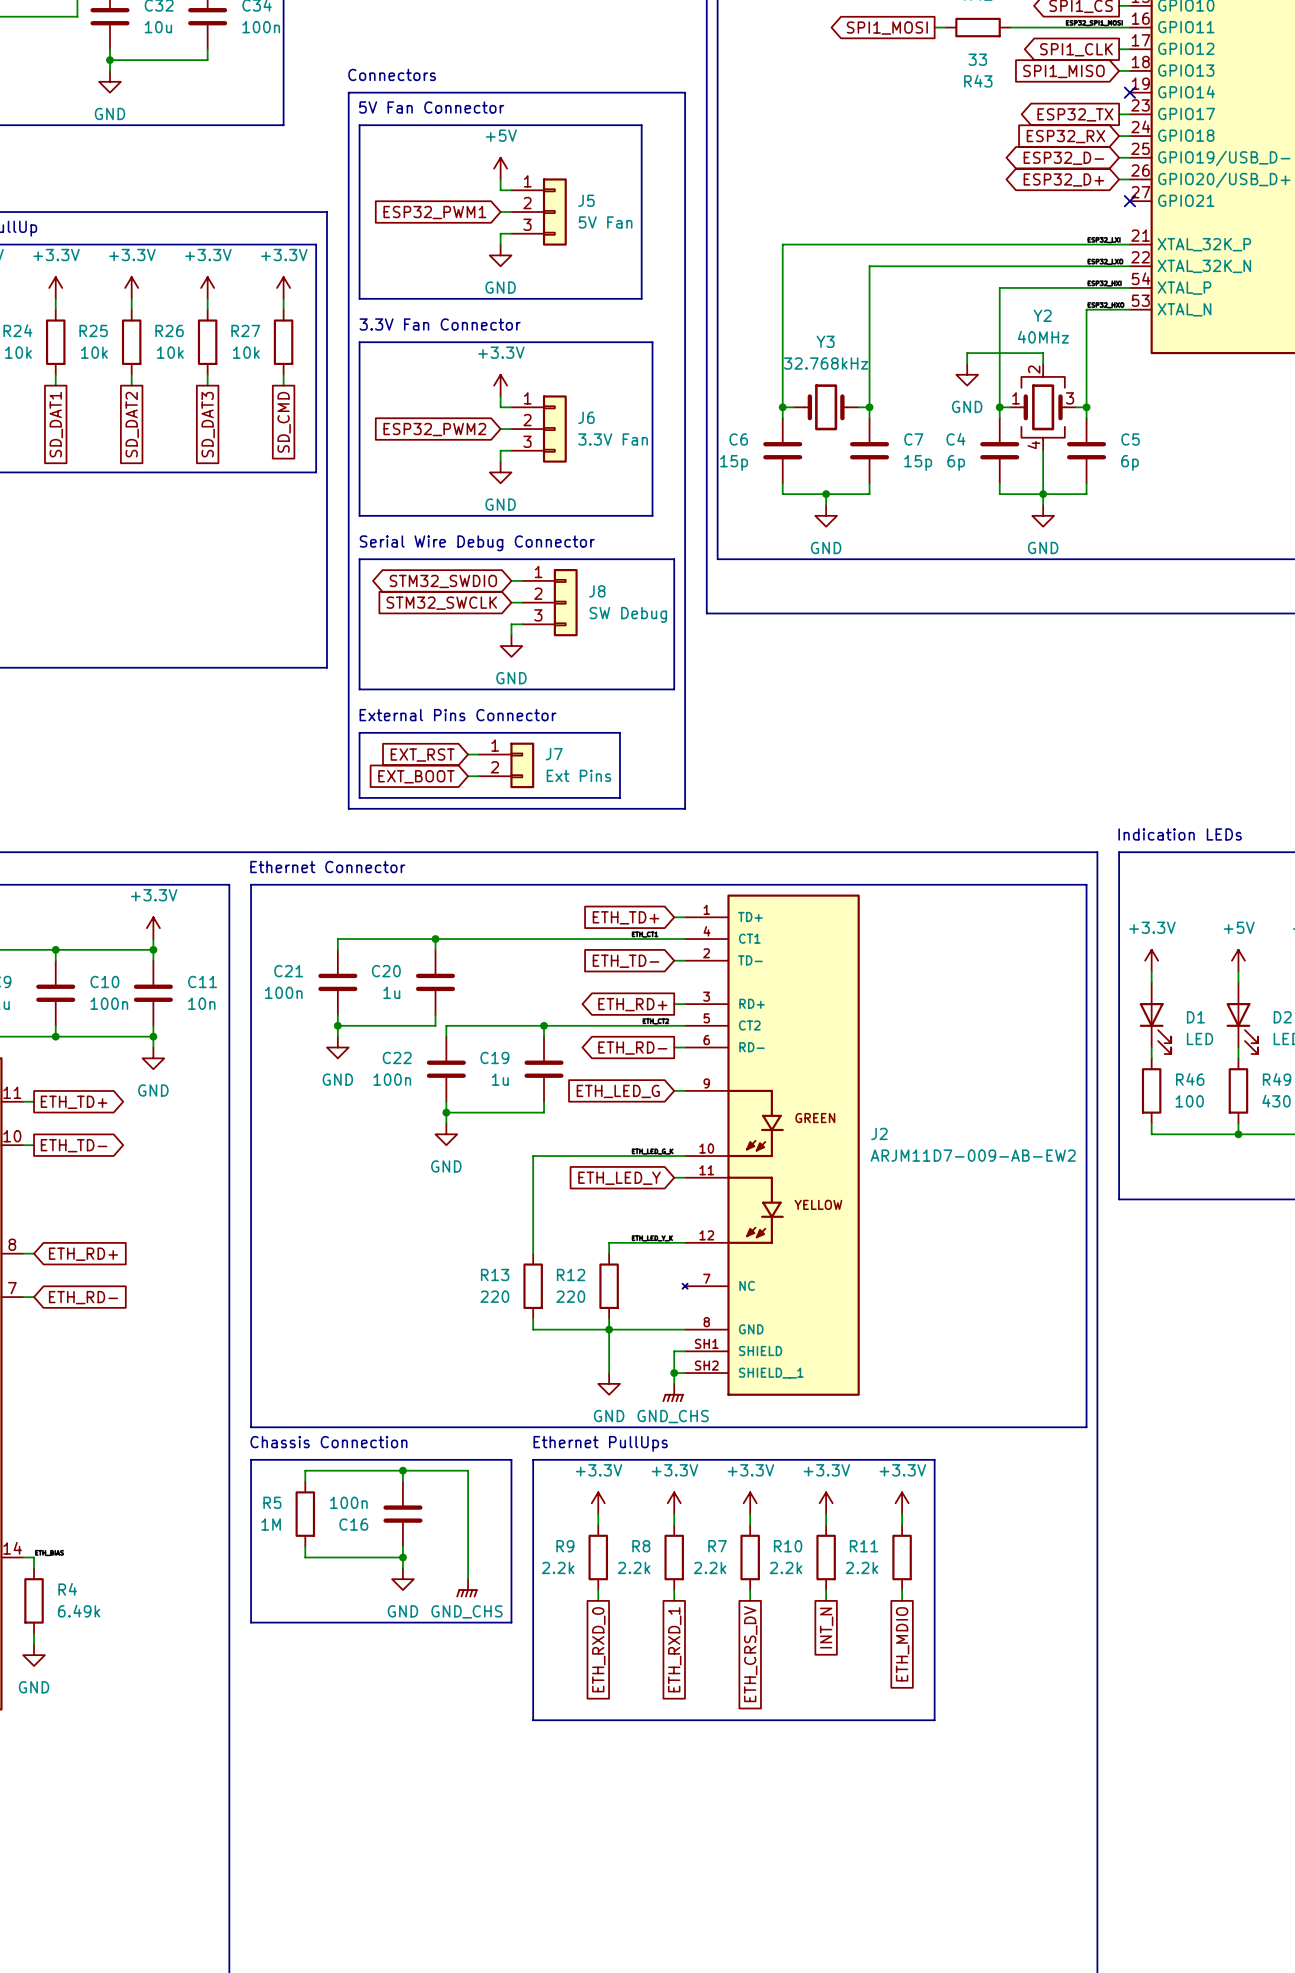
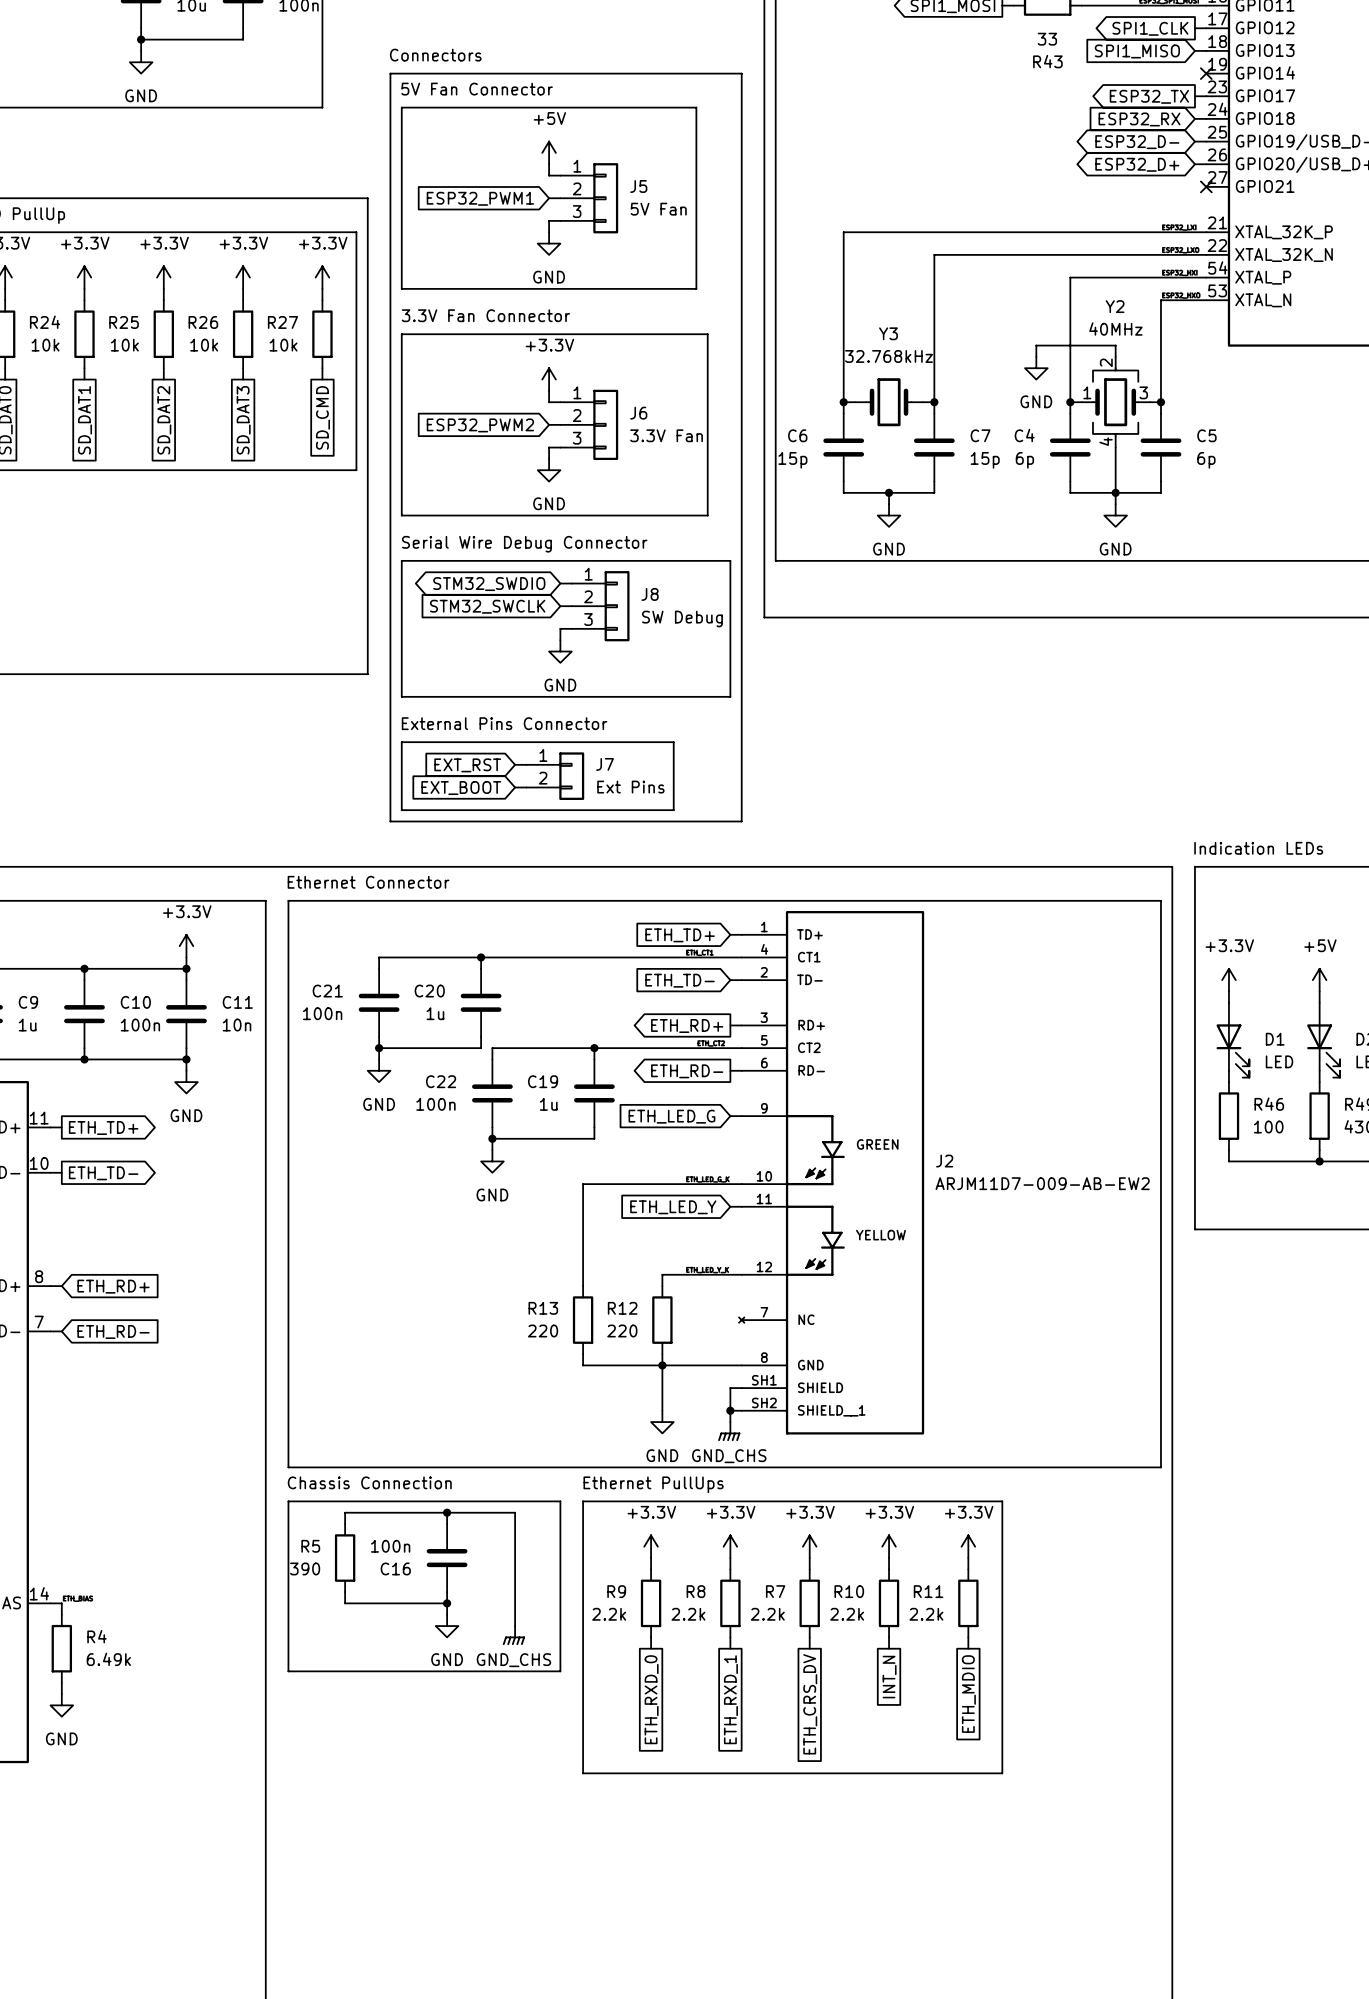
R5 value: 1M (271, 1524) -> 390 (305, 1568)

